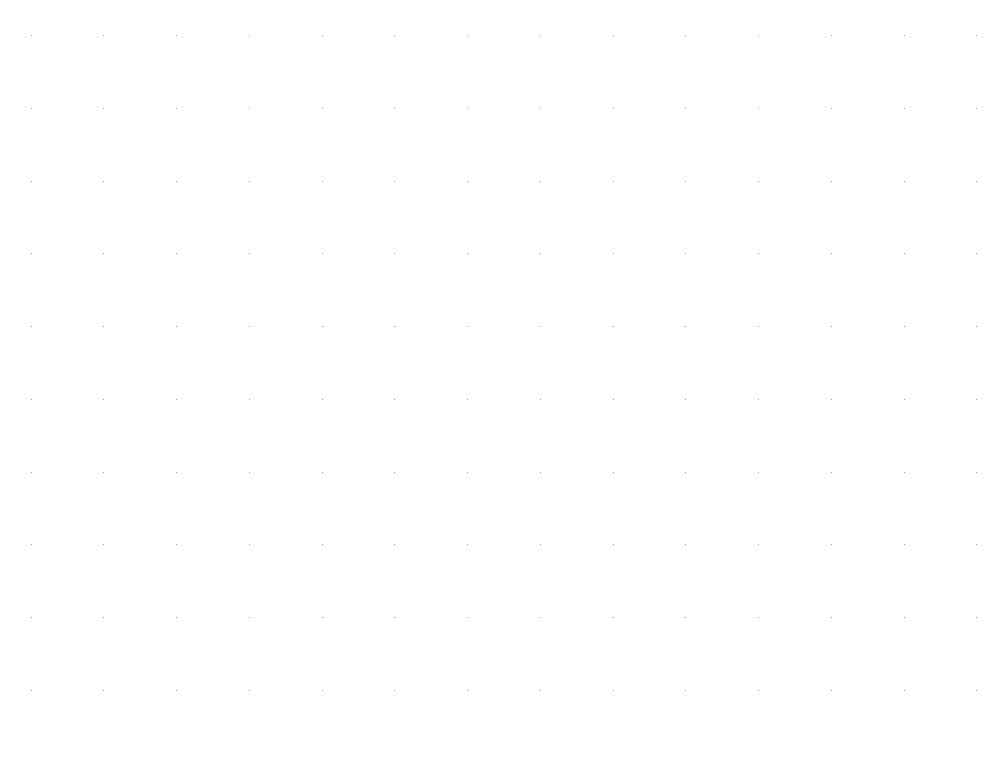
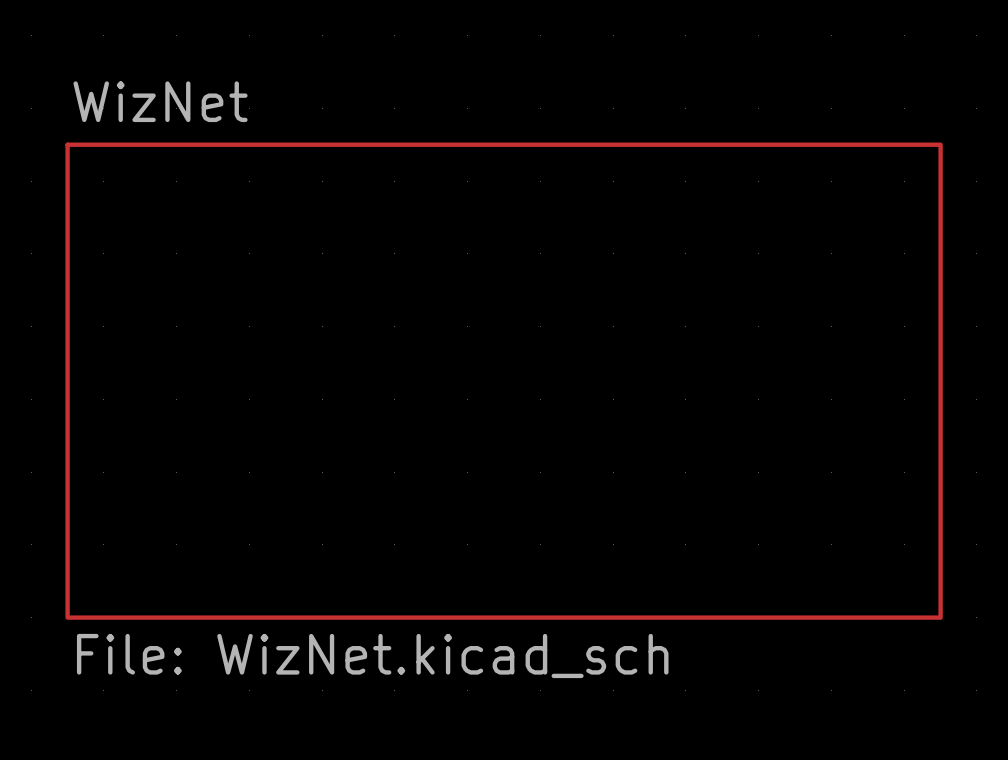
sheet WizNet: none -> File: WizNet.kicad_sch (504, 381)

